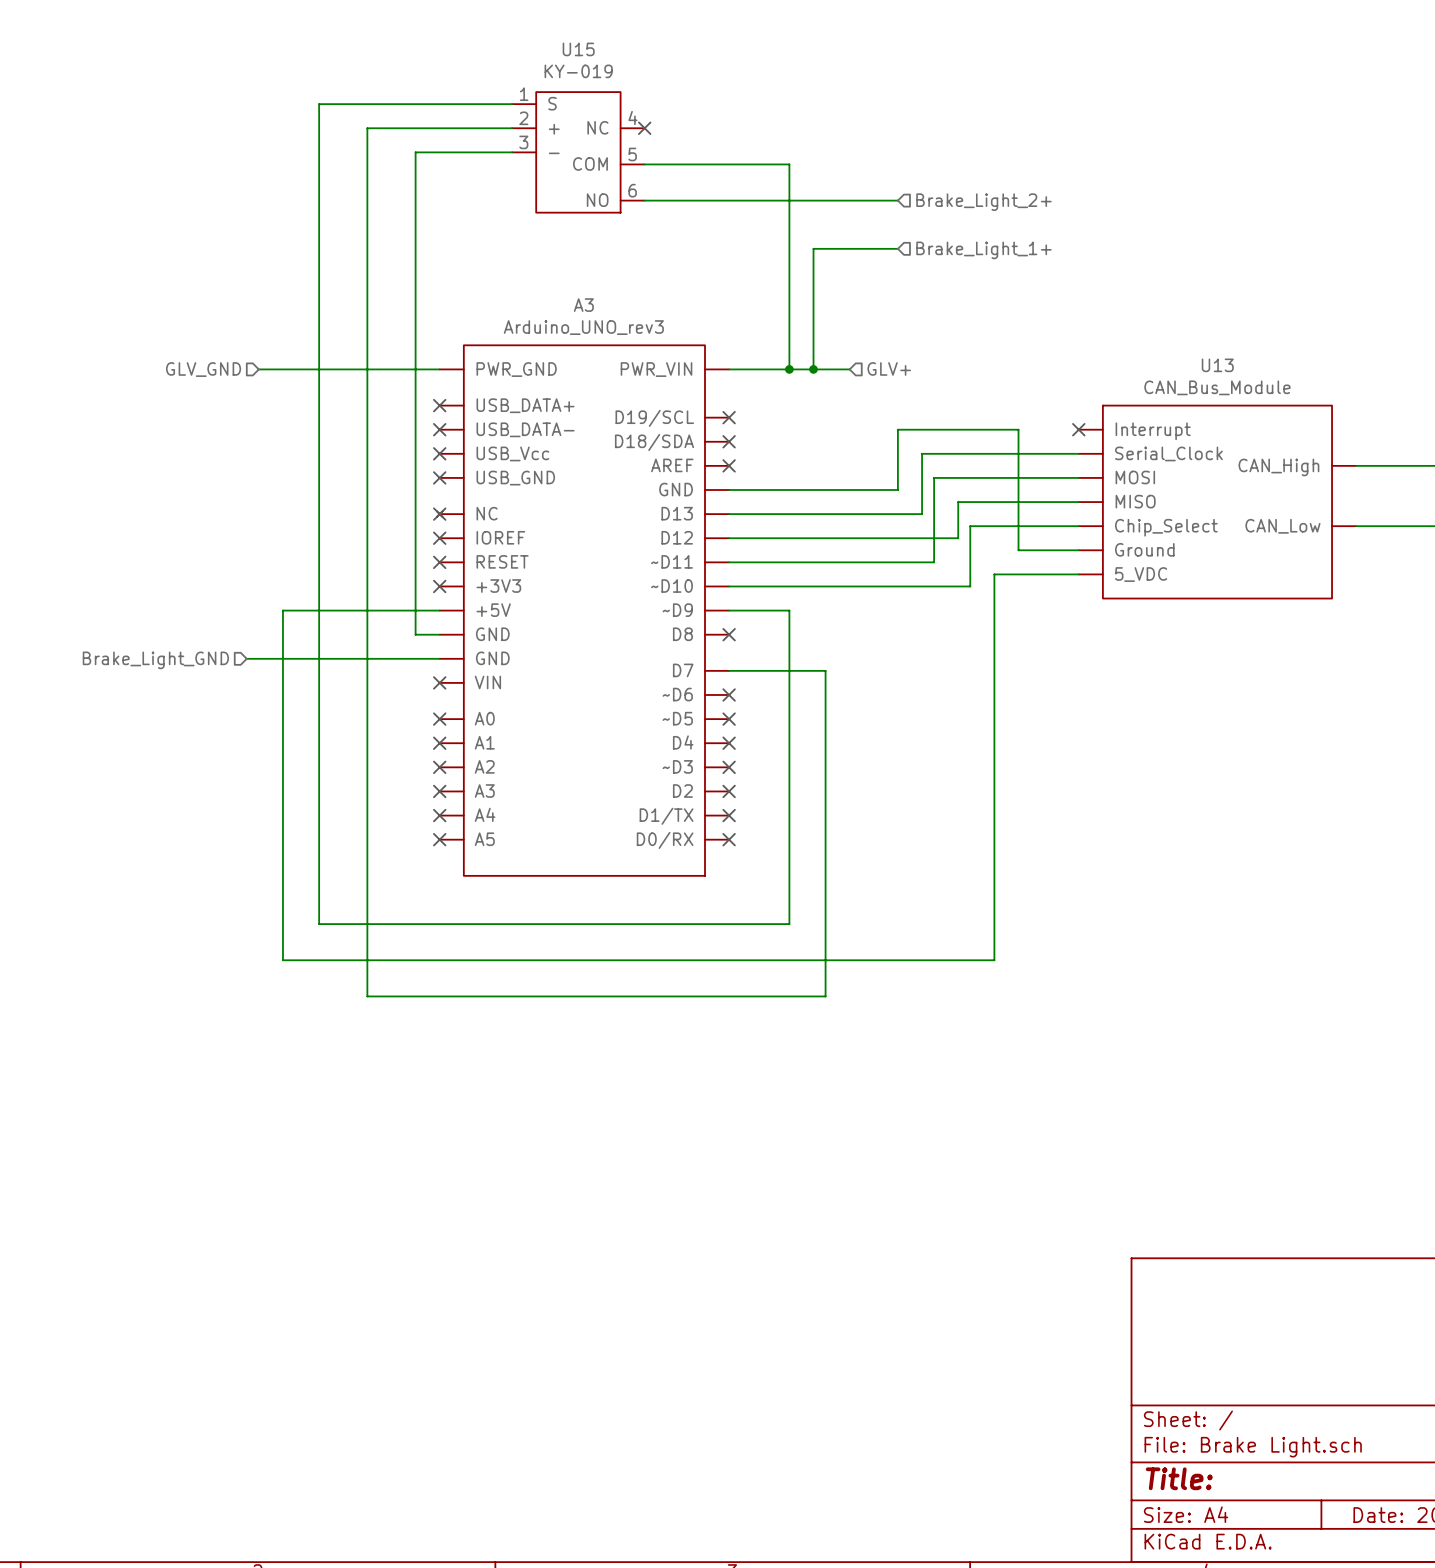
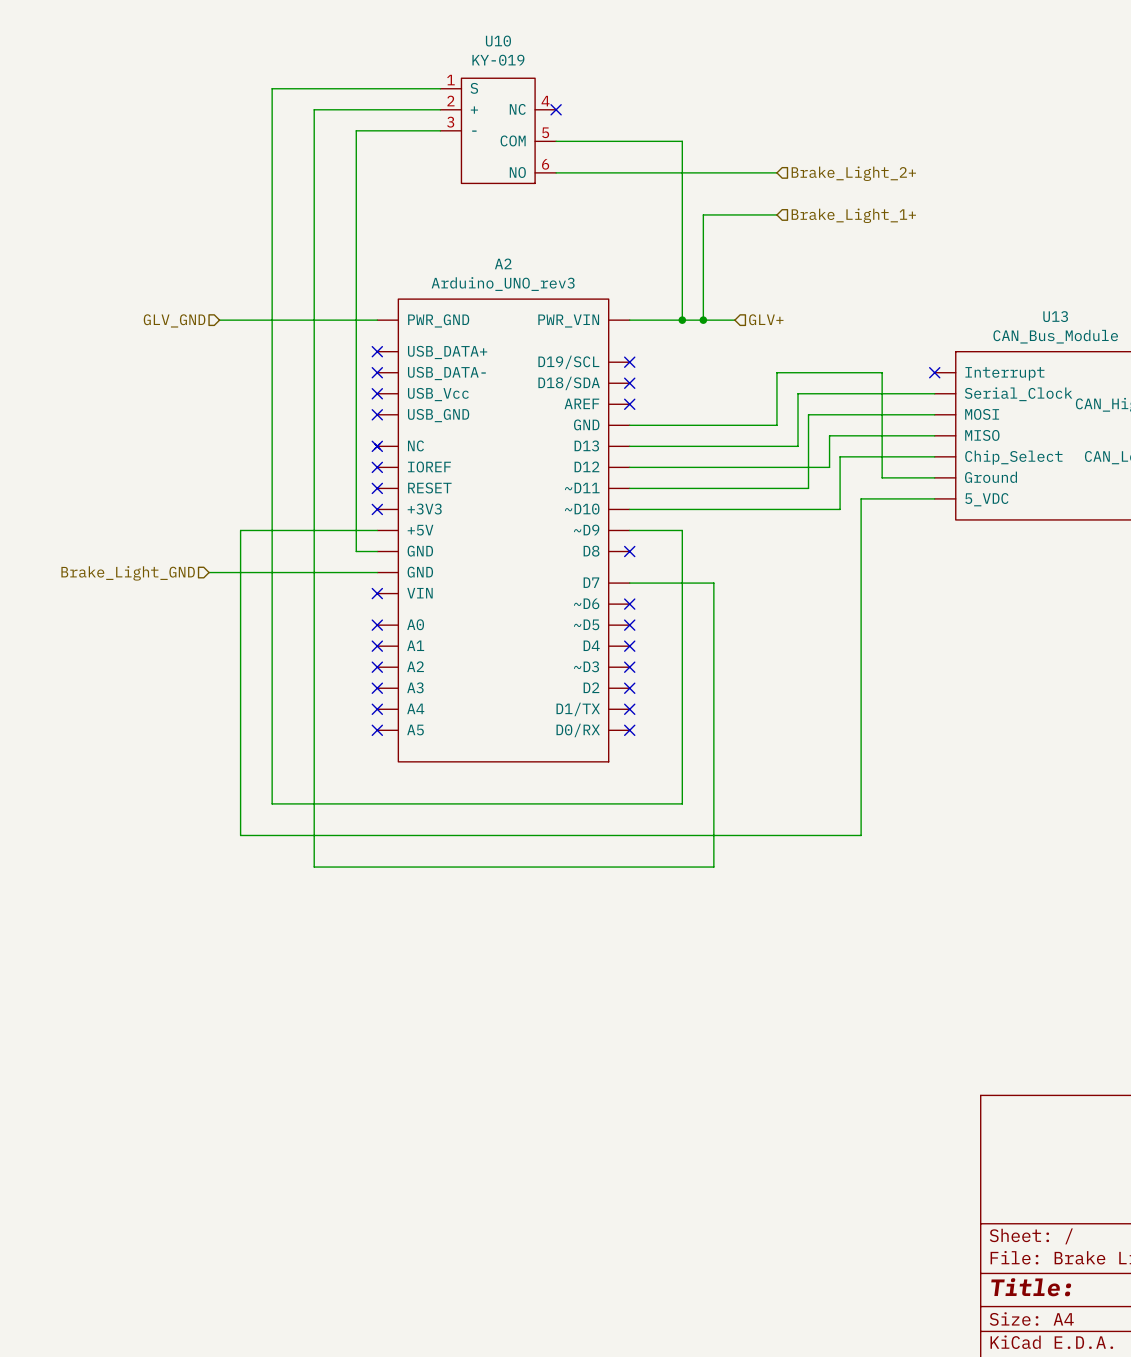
U15 name: U15 (578, 49) -> U10 (498, 41)
A3 name: A3 (583, 305) -> A2 (503, 263)

